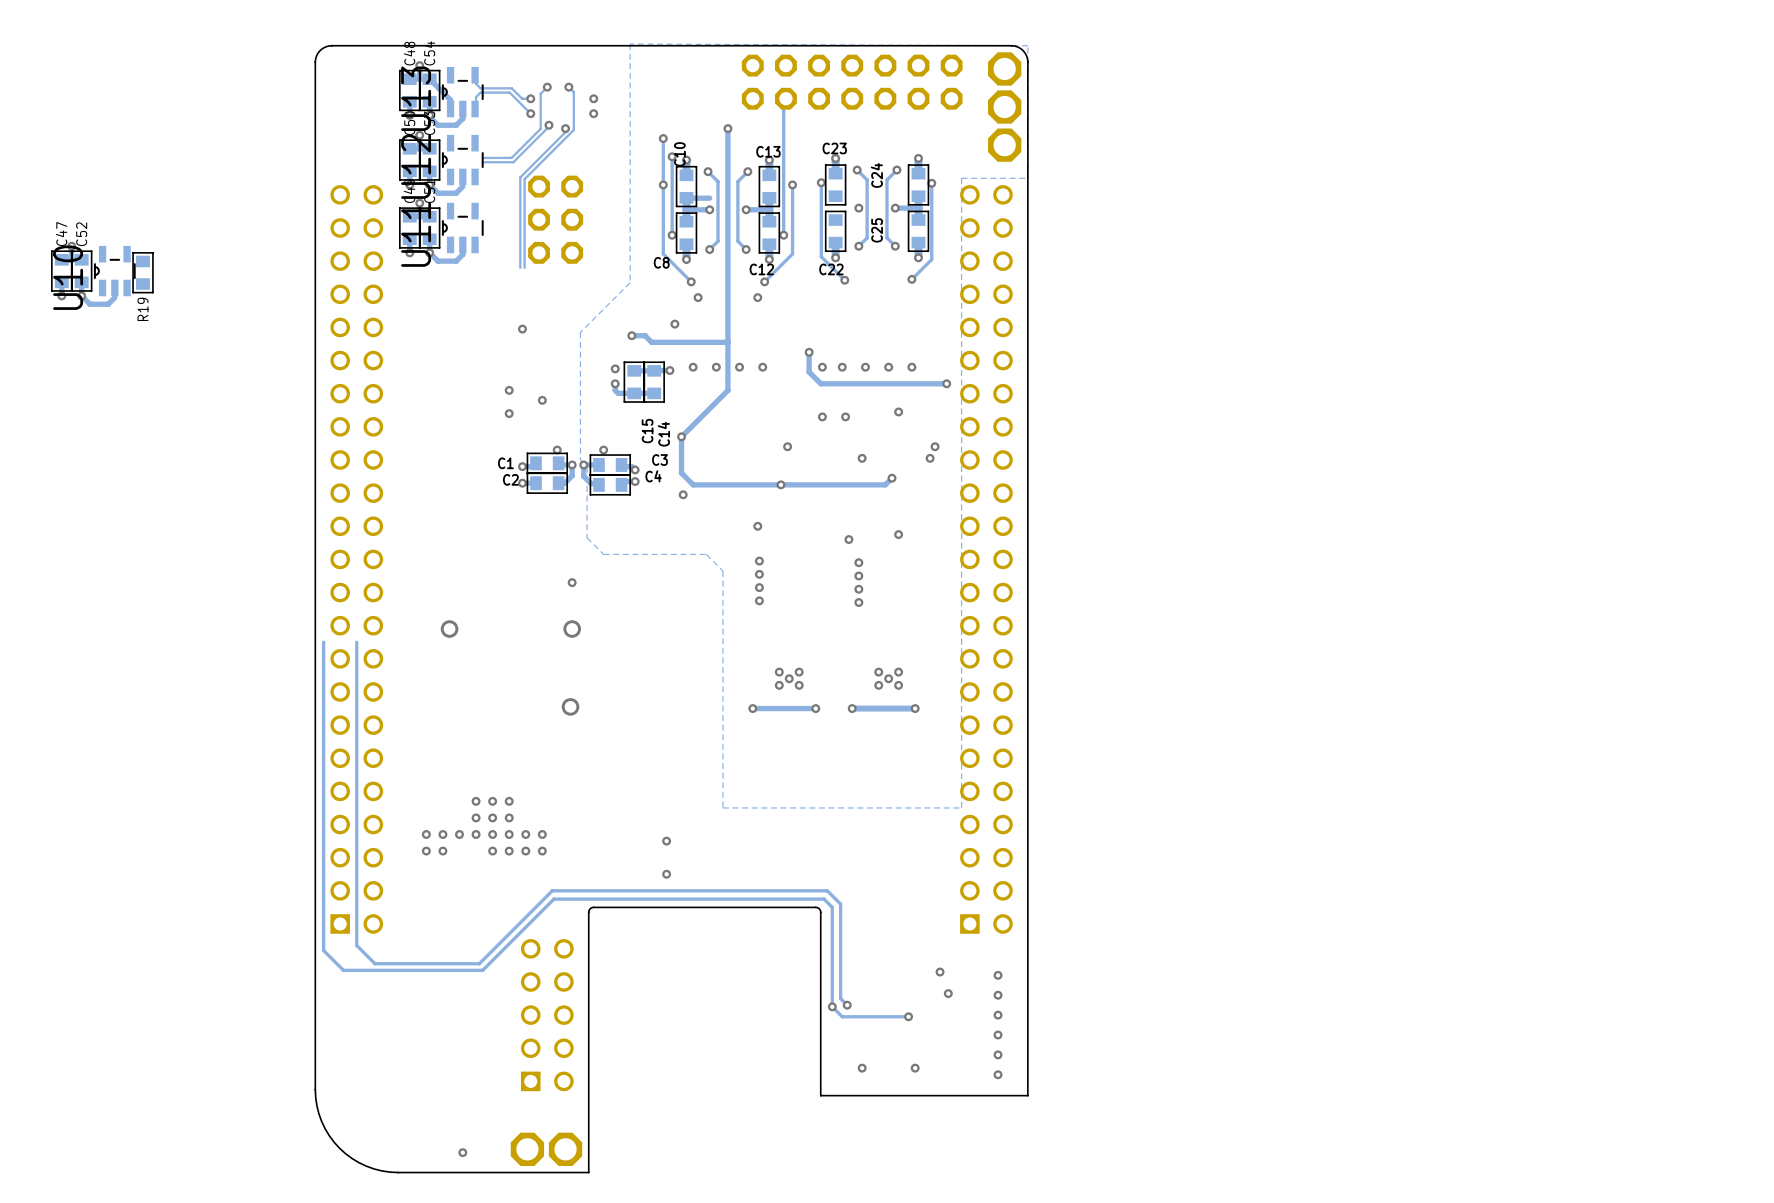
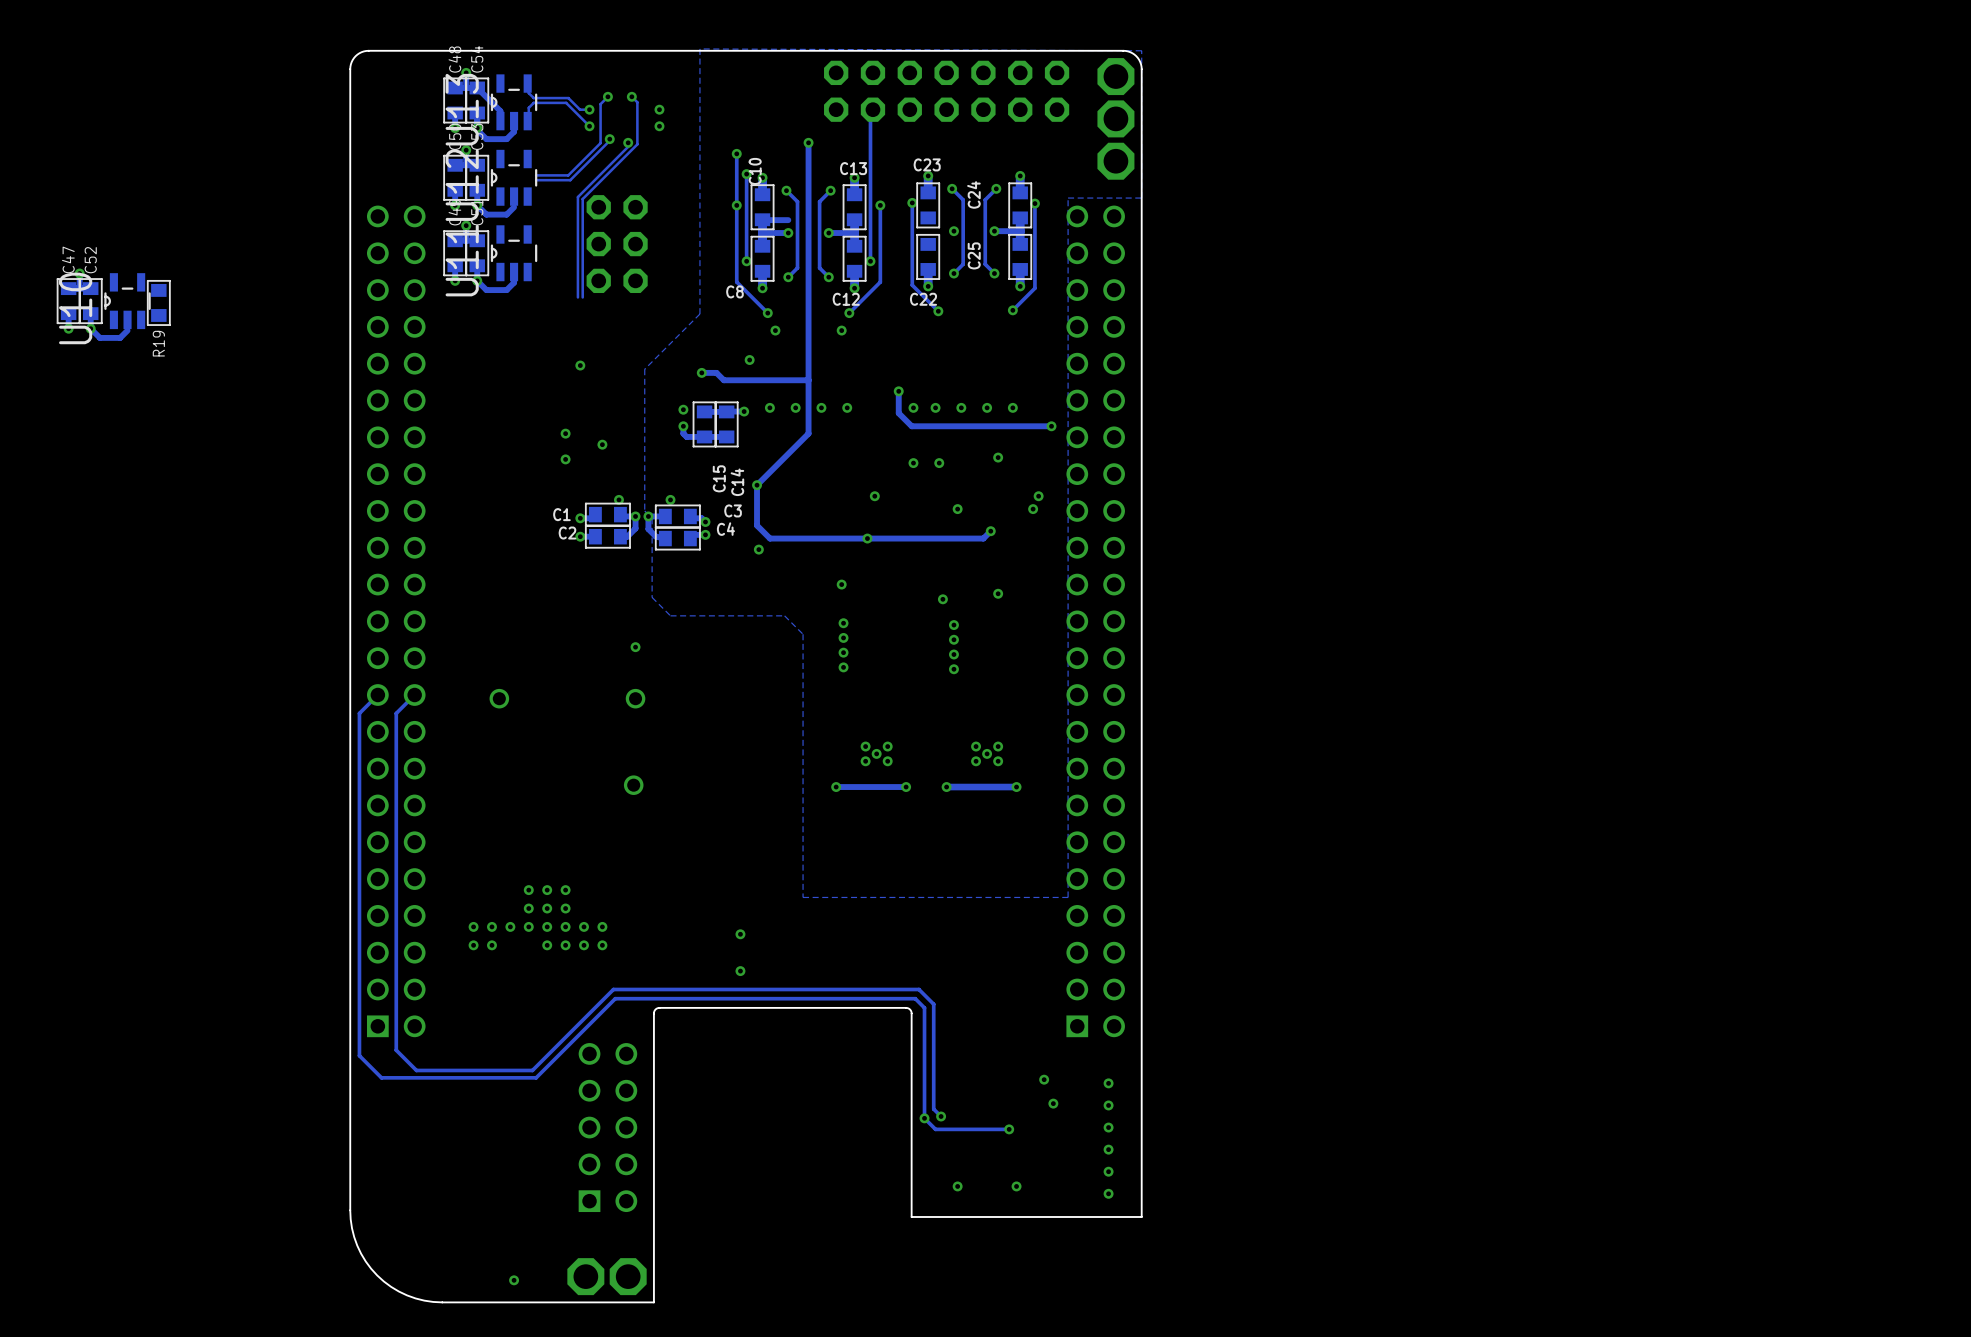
track: none -> (377, 695) (359, 713)
track: none -> (414, 695) (396, 713)

